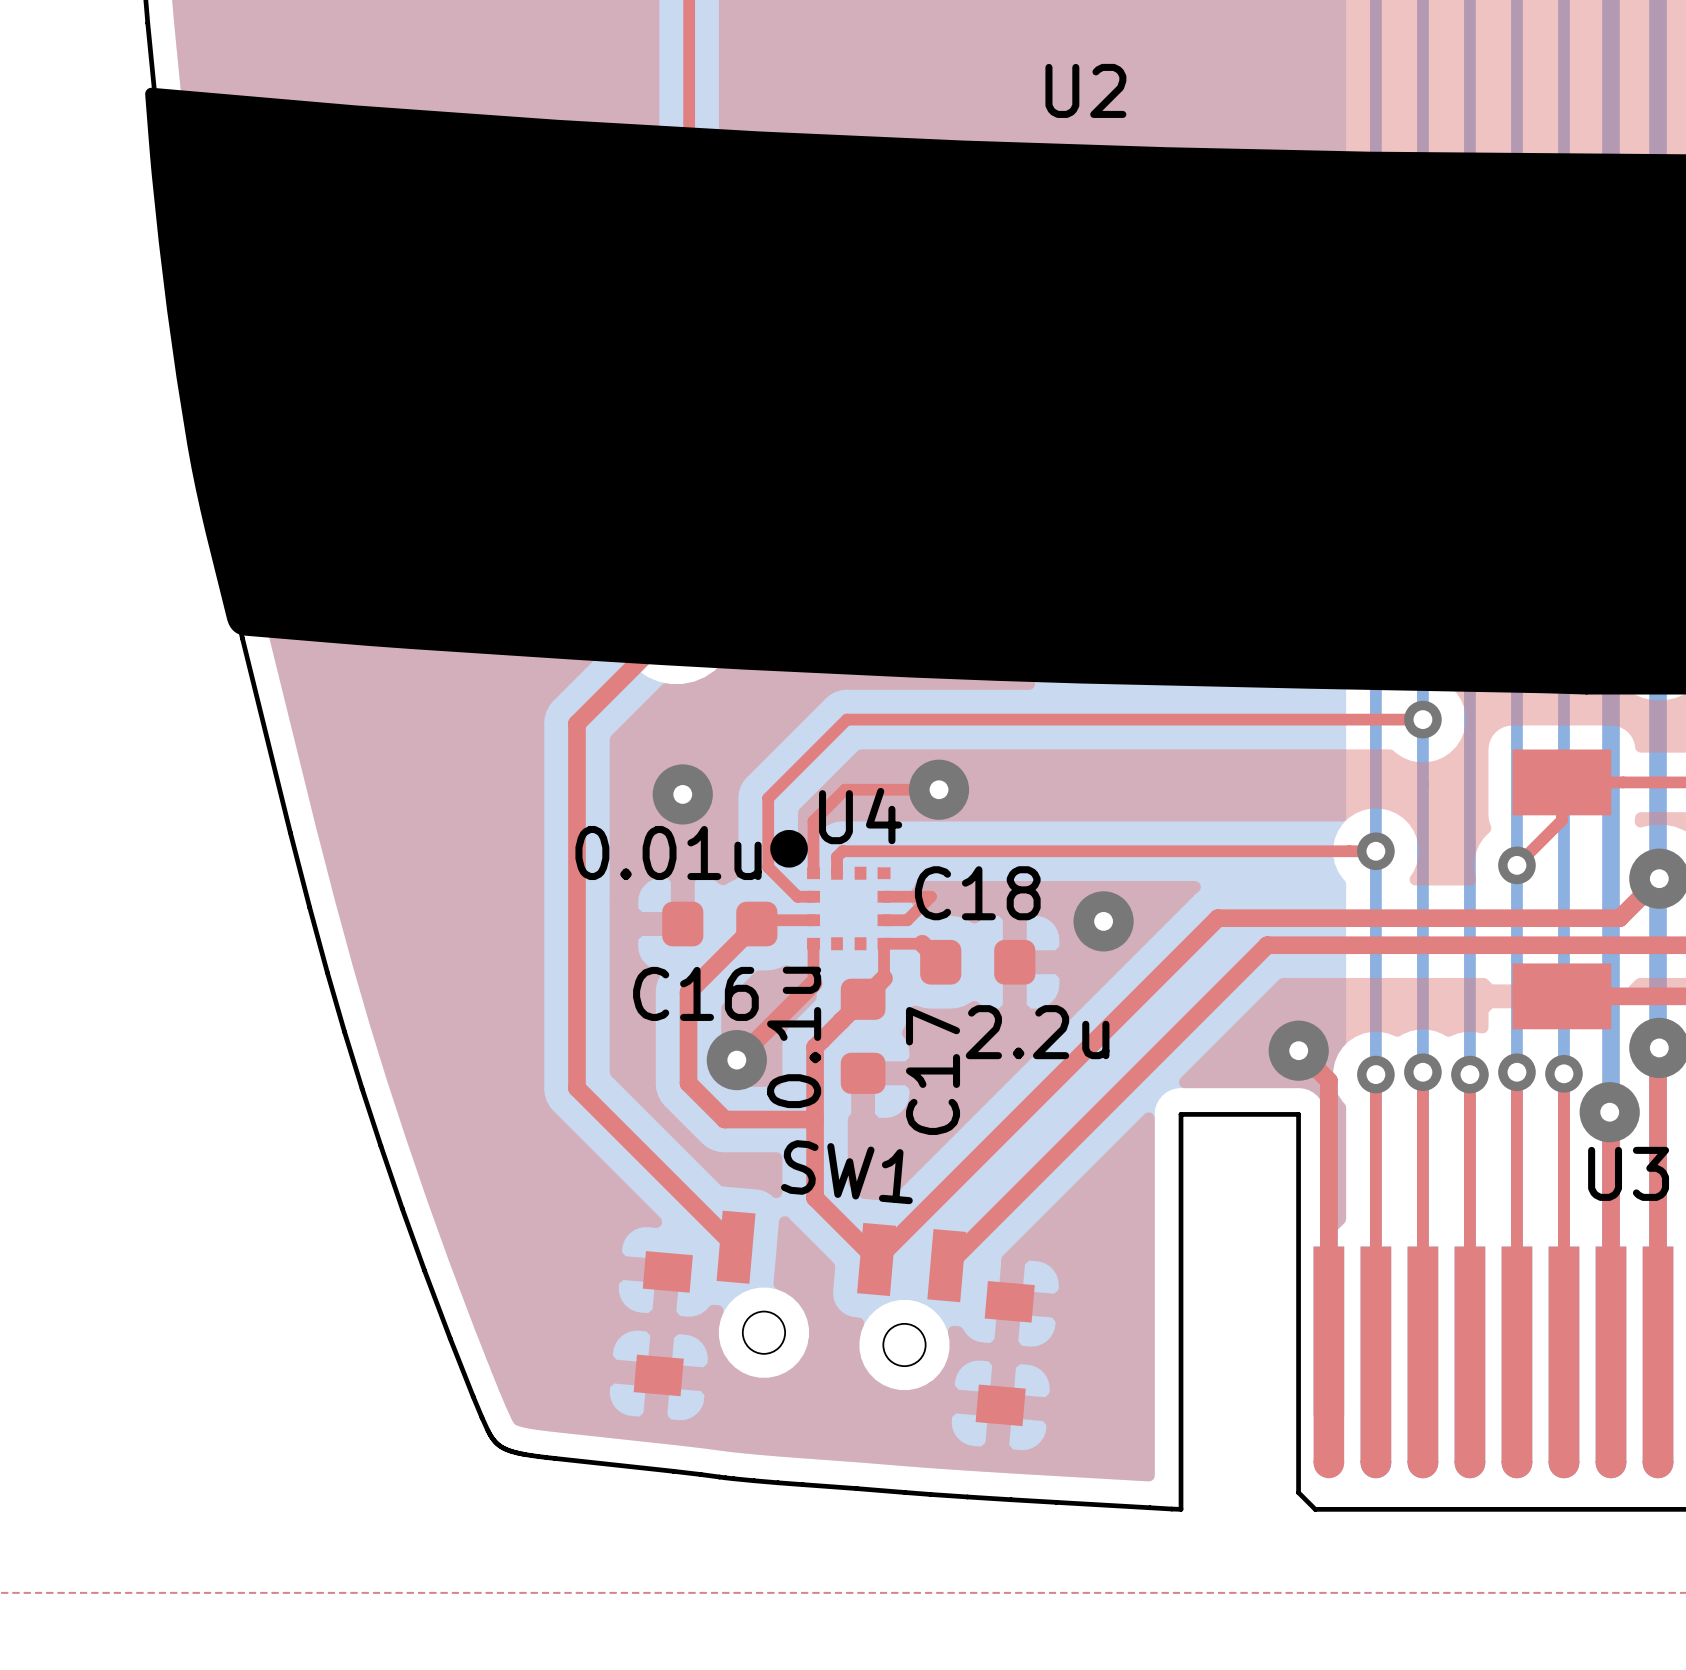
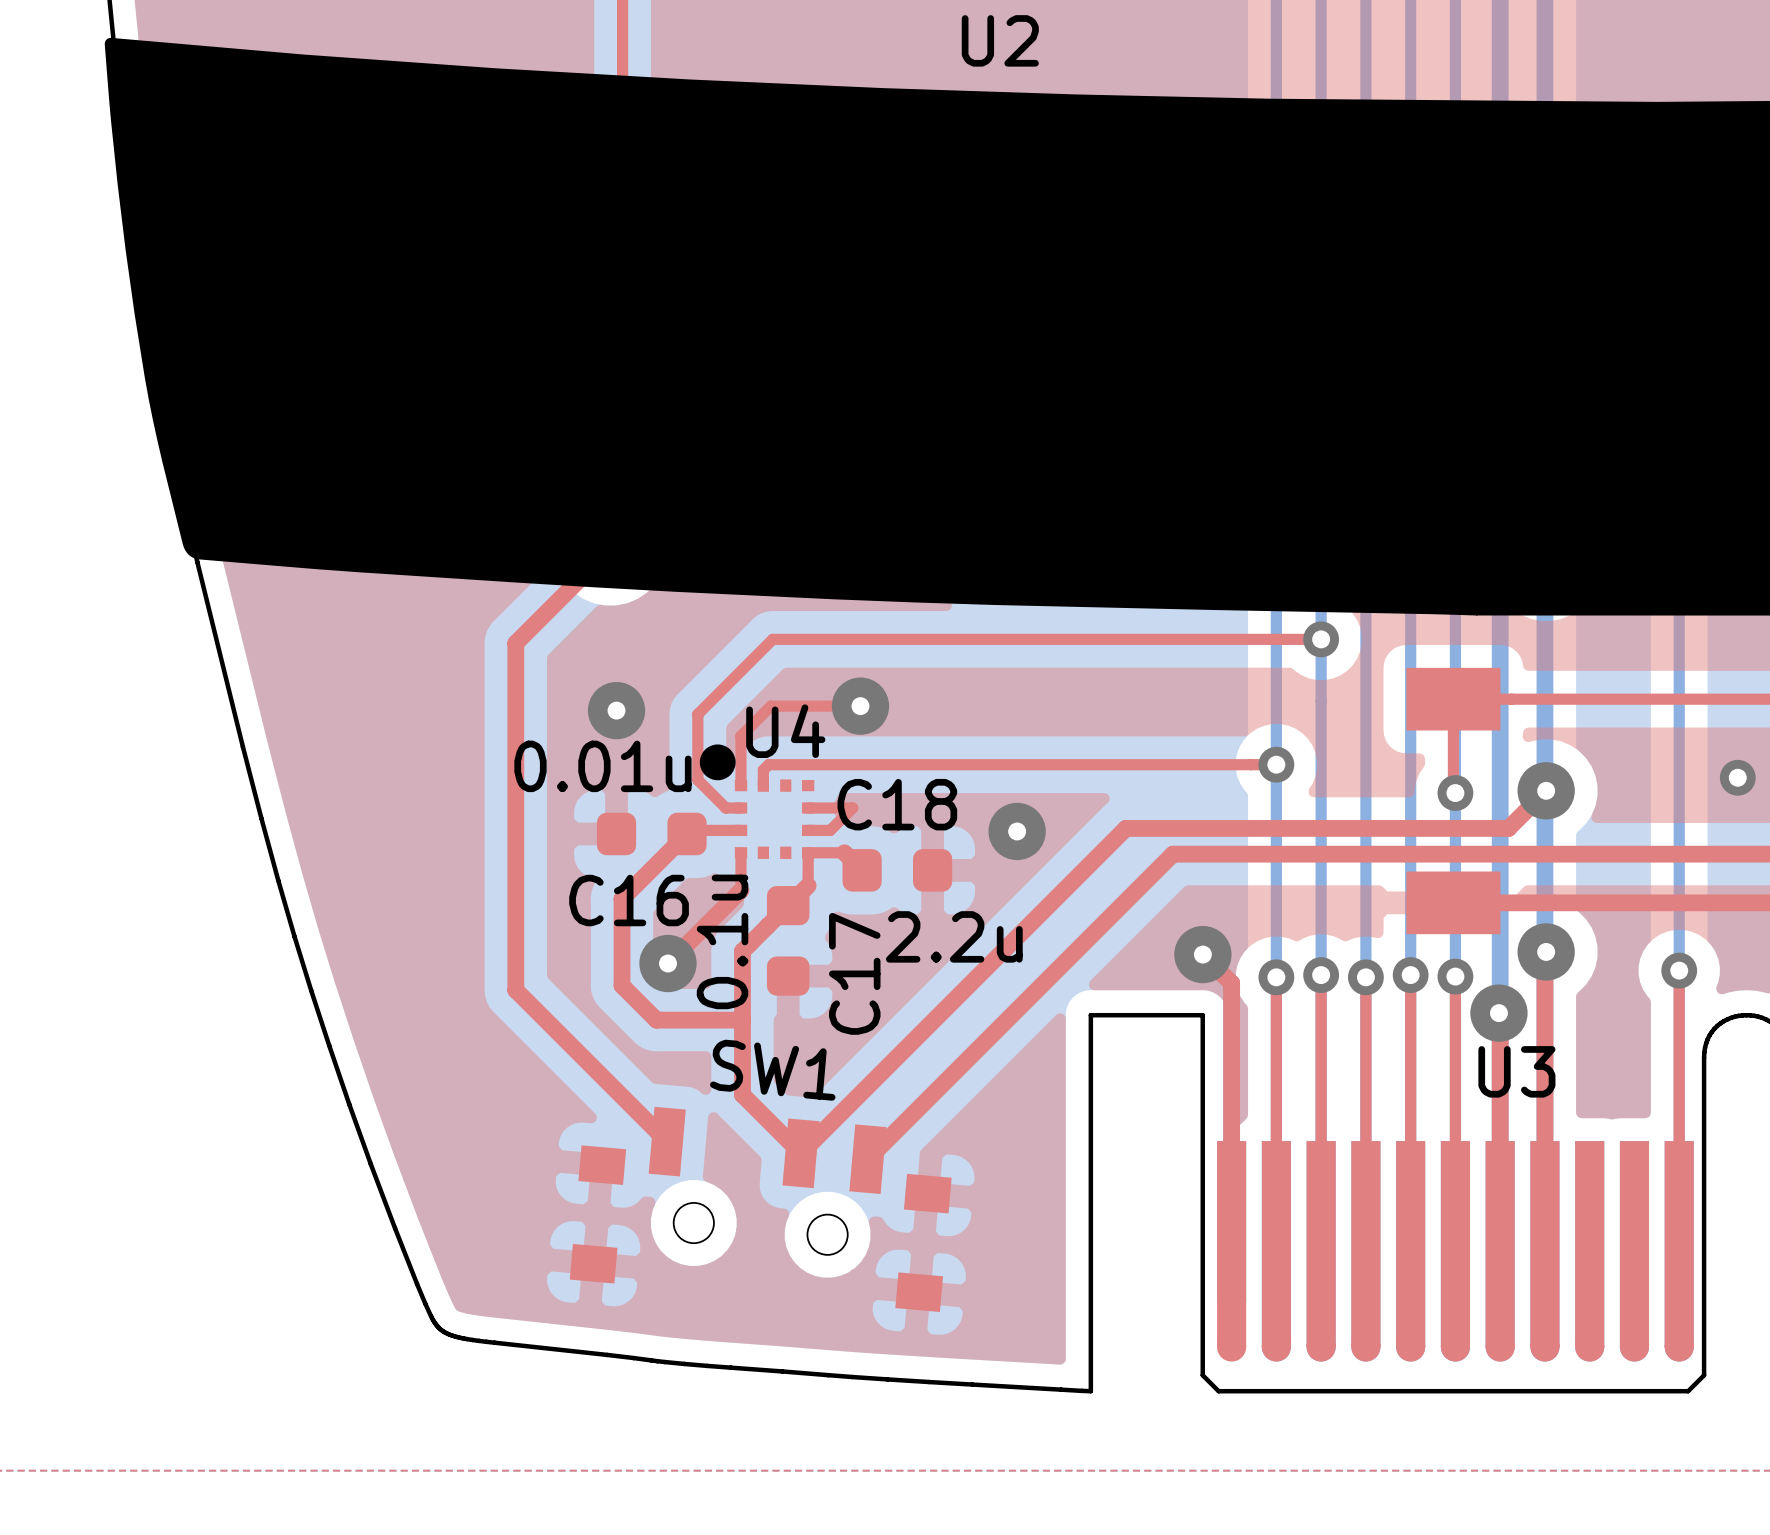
top track: (1561, 820) (1516, 865) -> (1453, 735) (1453, 791) (1455, 793)
via position: (1516, 865) -> (1455, 793)

